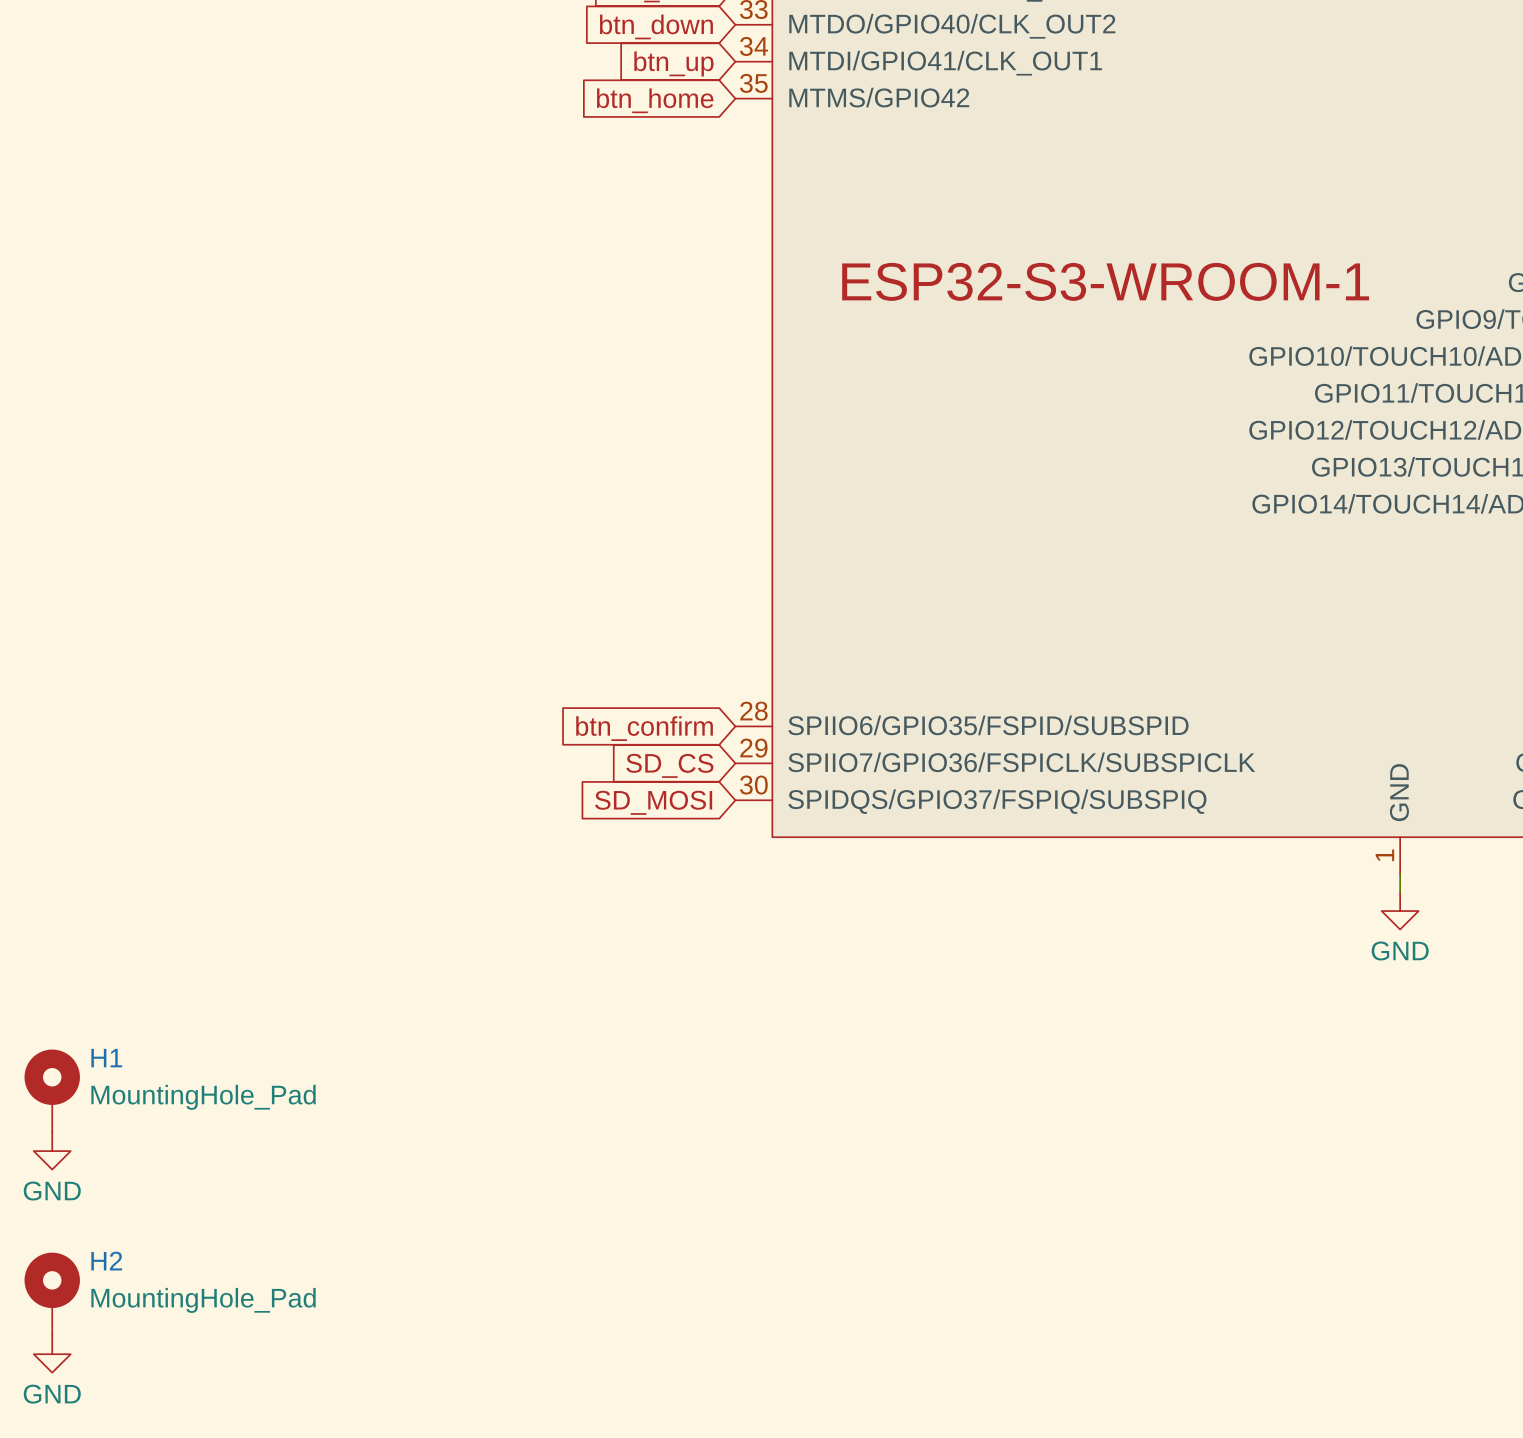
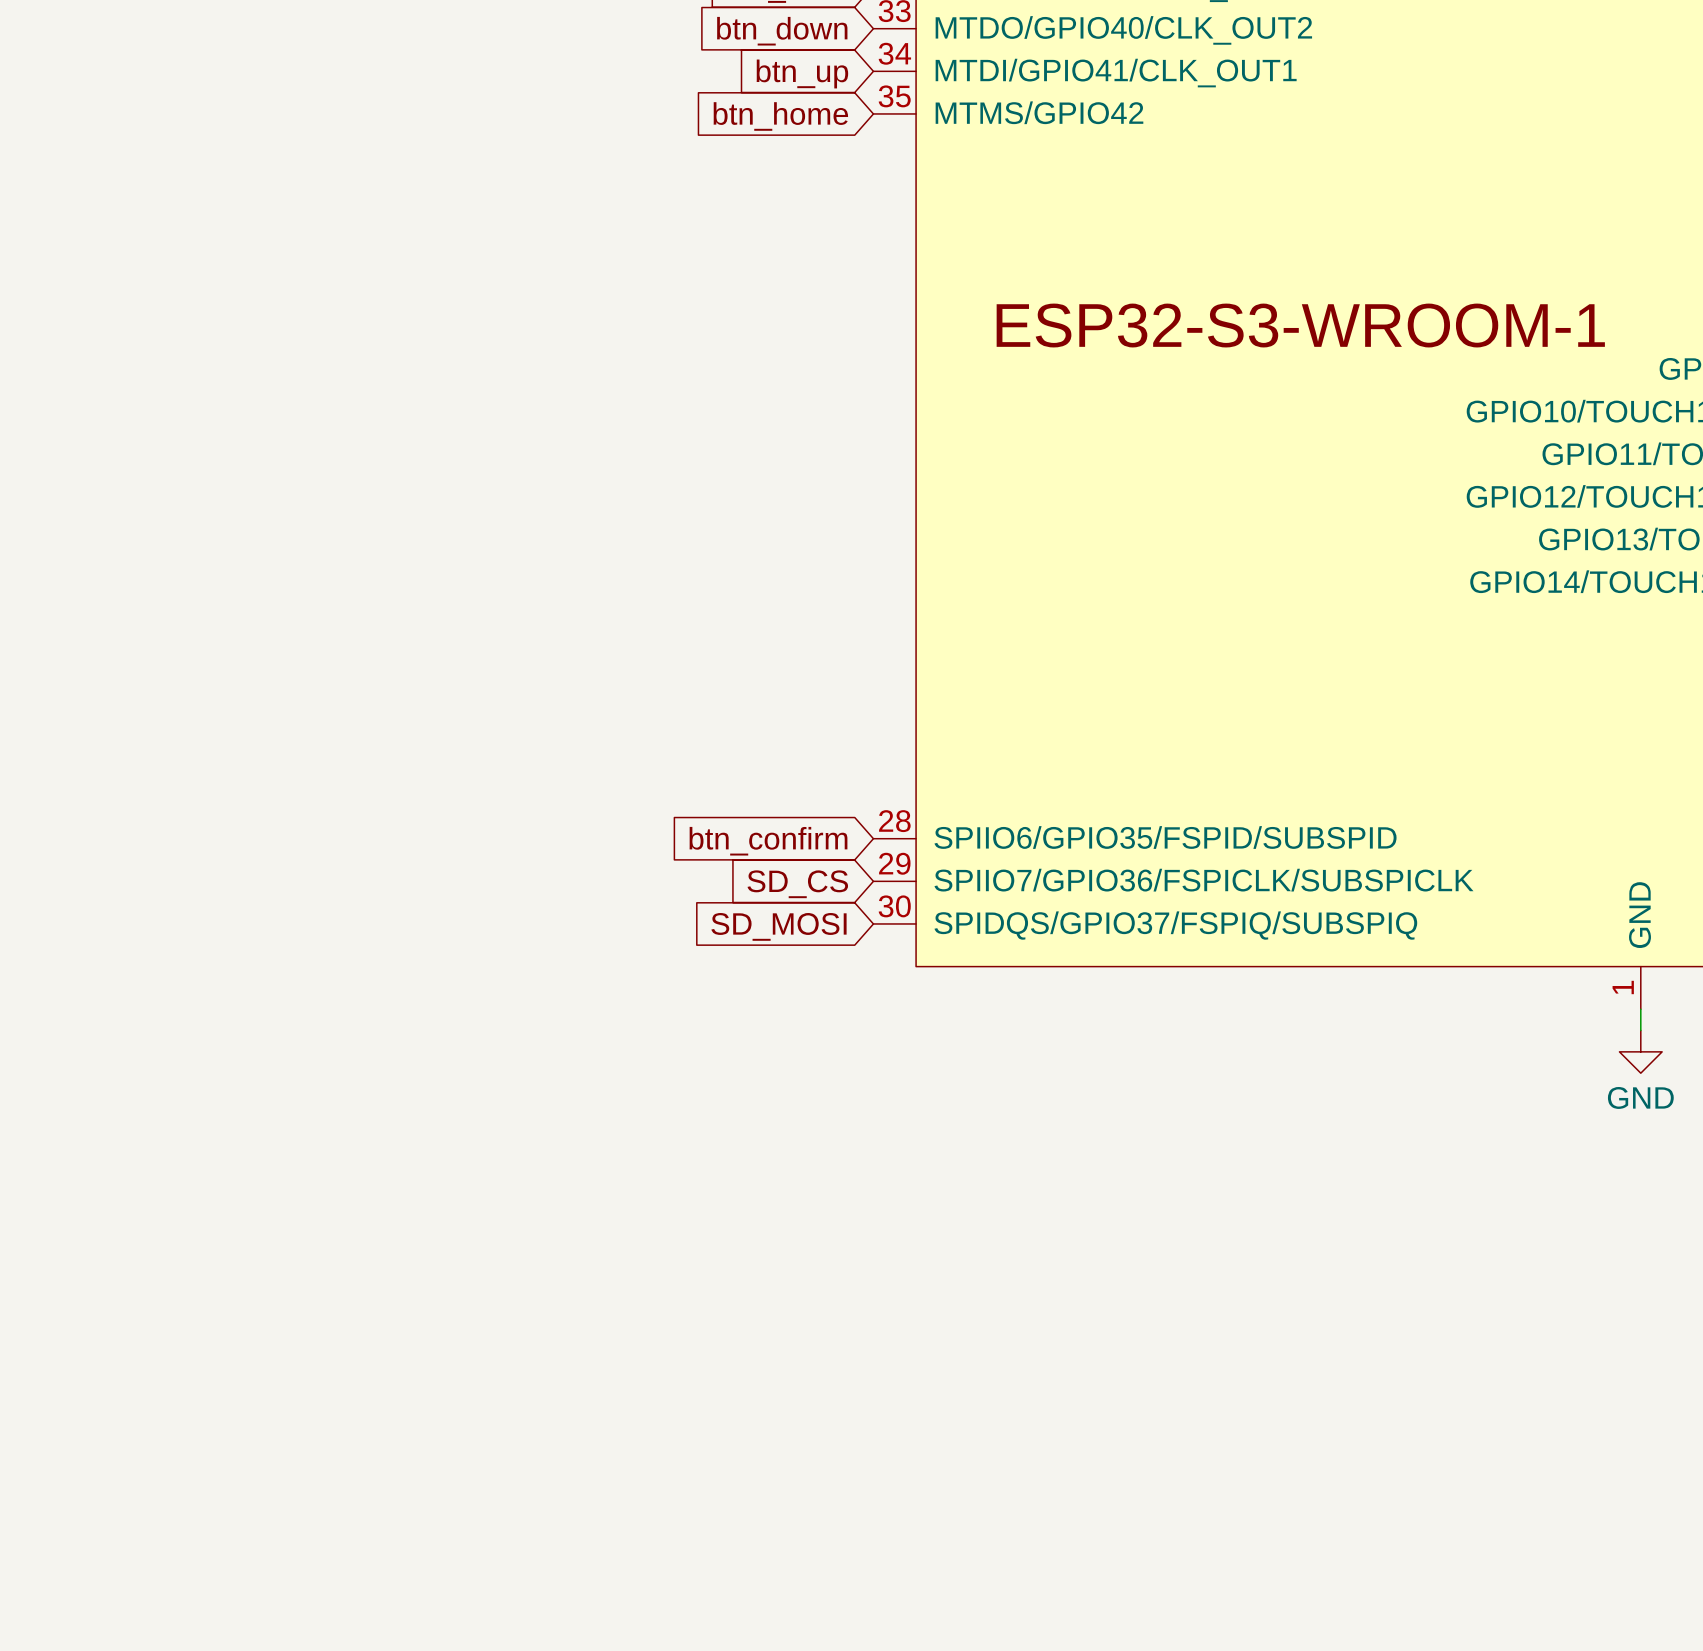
H1: MountingHole_Pad (52, 1091) -> none
power symbol: GND (52, 1151) -> none
H2: MountingHole_Pad (52, 1294) -> none
power symbol: GND (52, 1354) -> none

